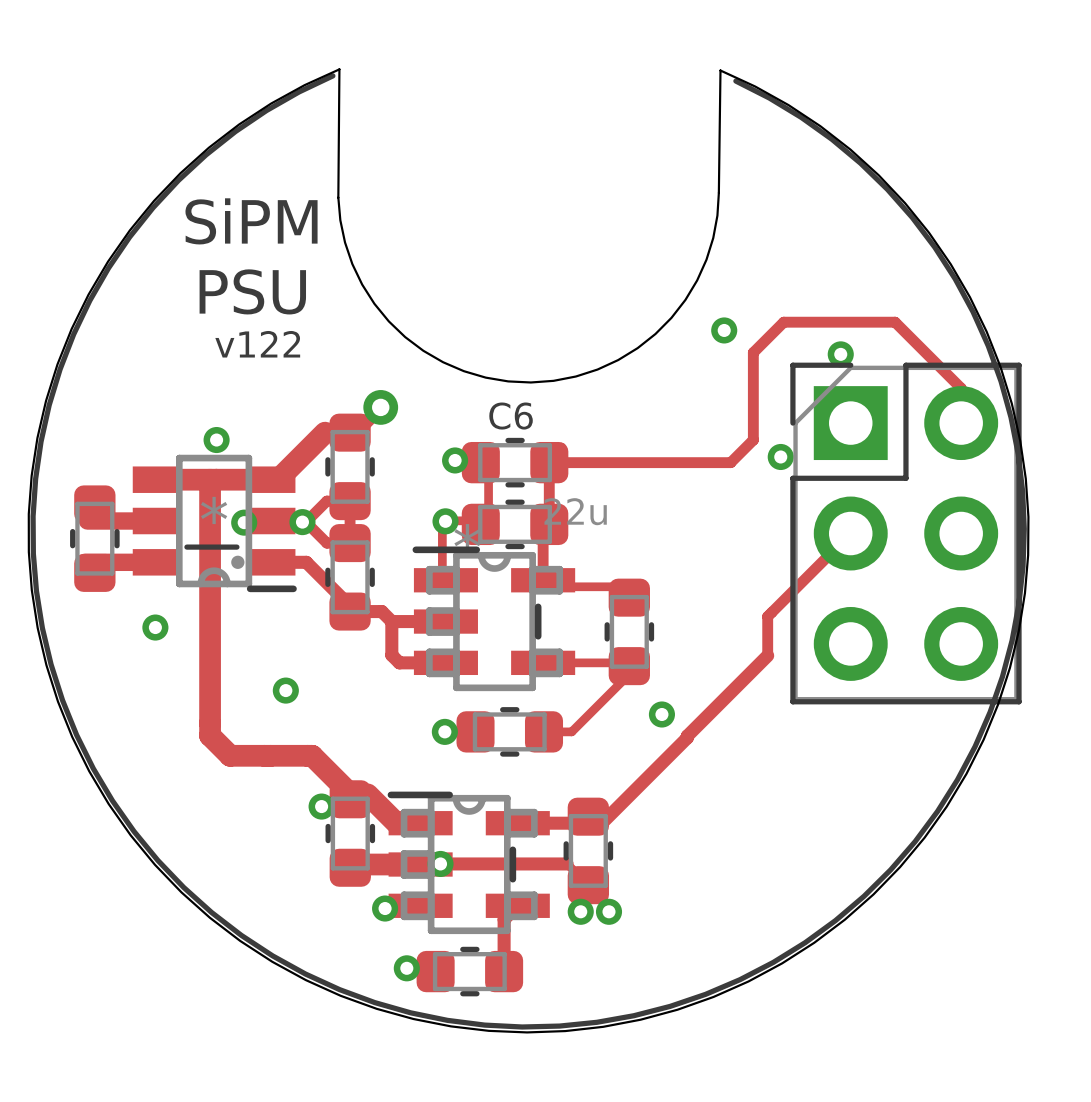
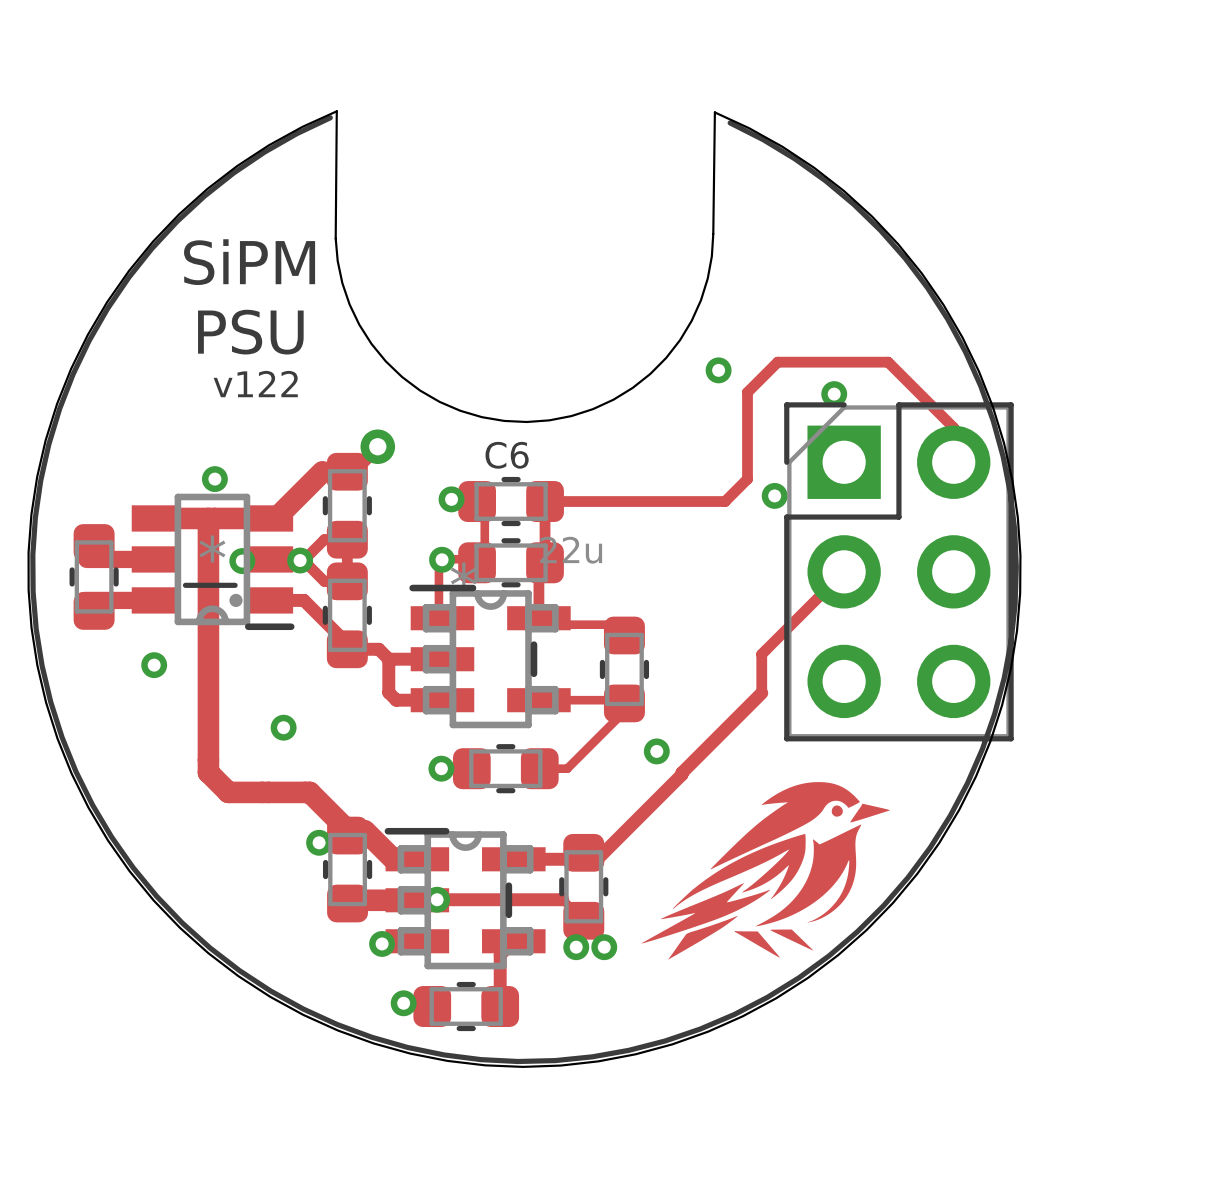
drawing: none -> [641, 782, 890, 960]

